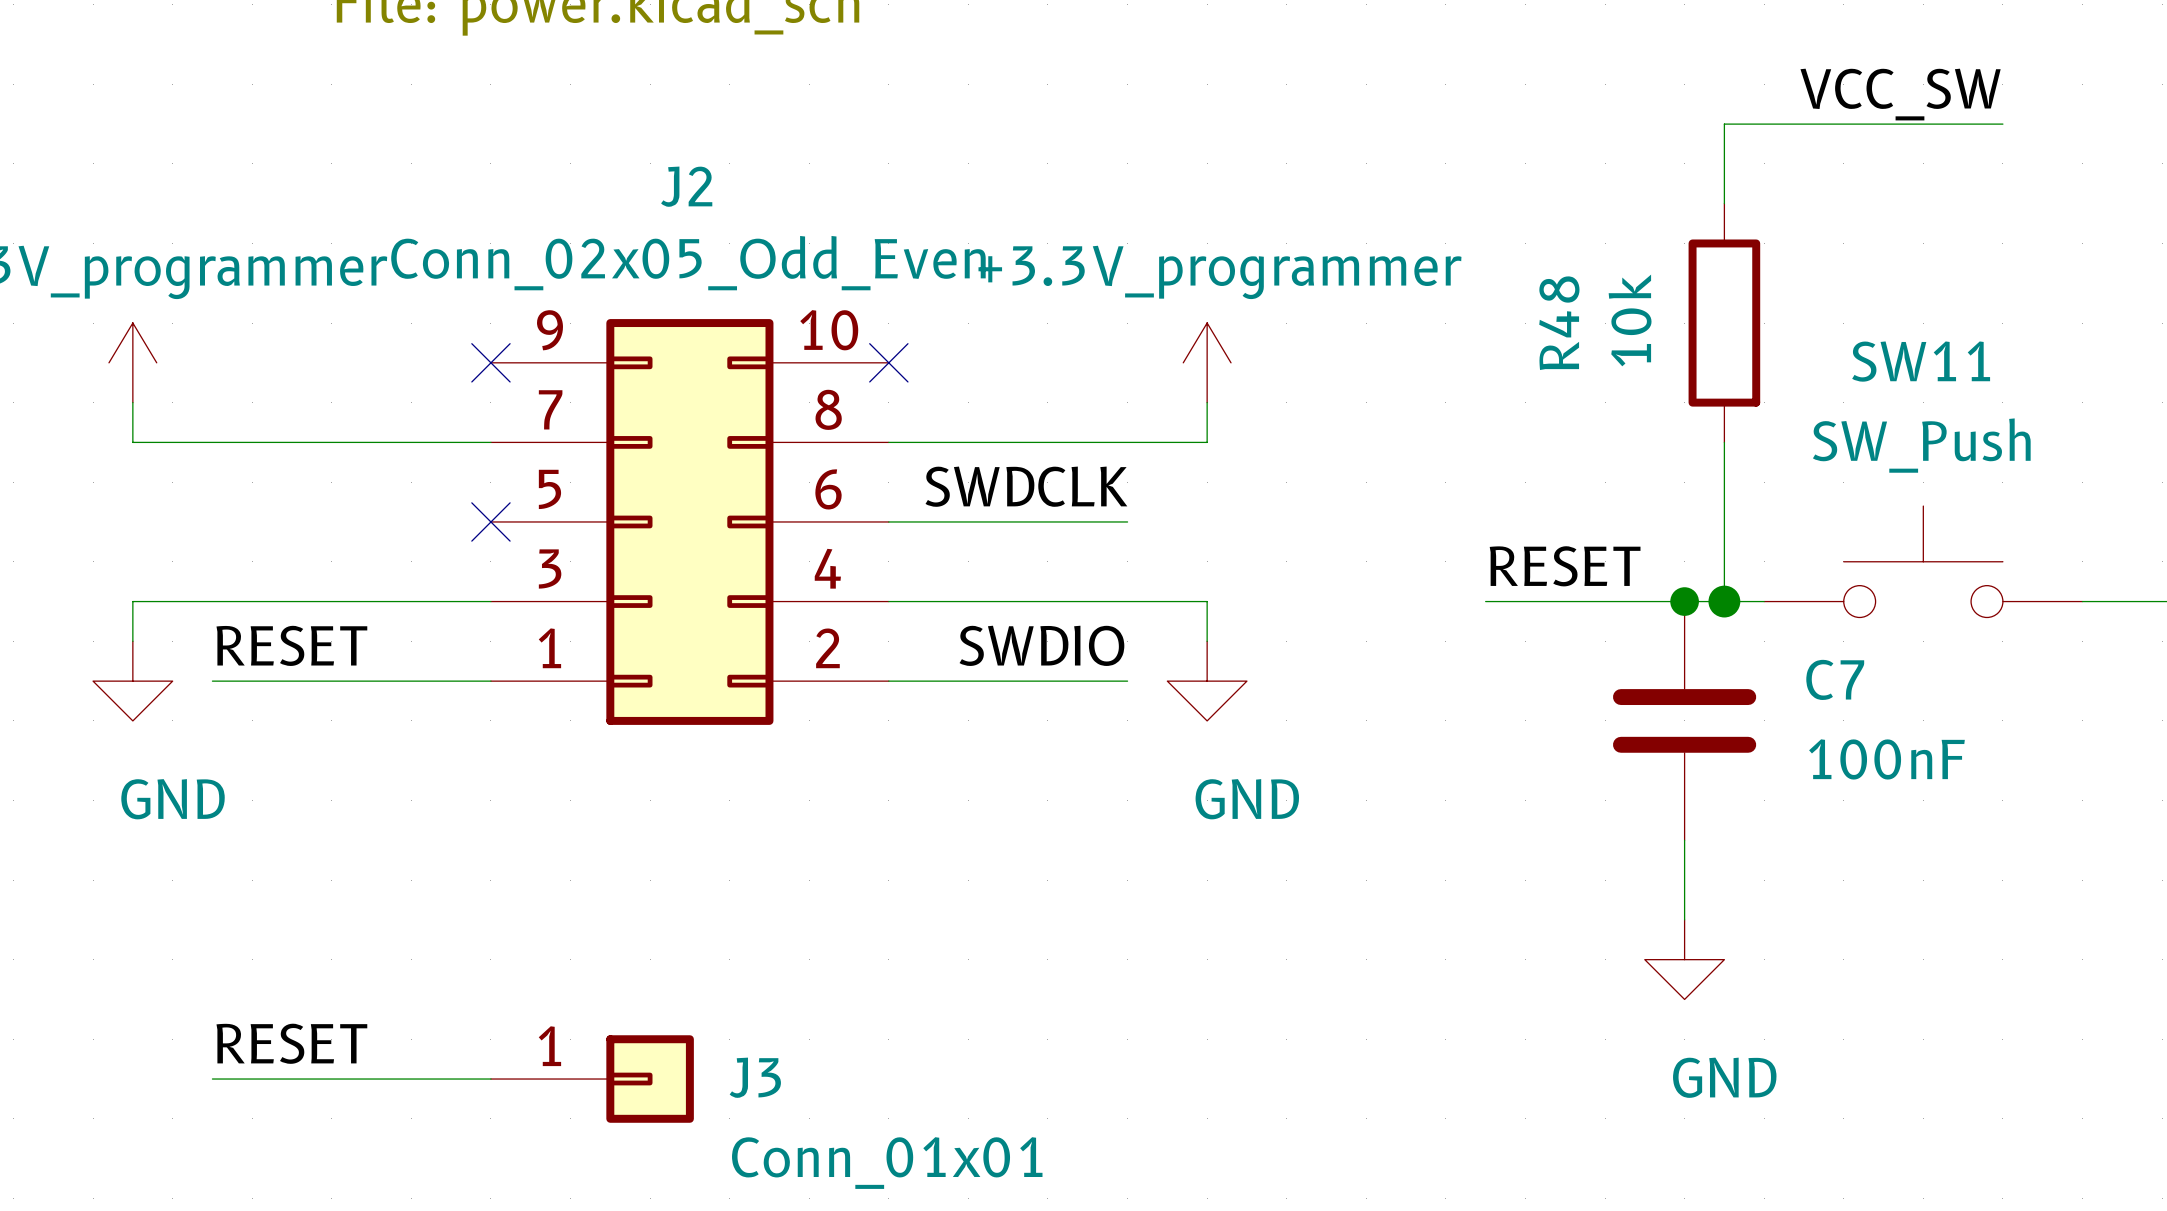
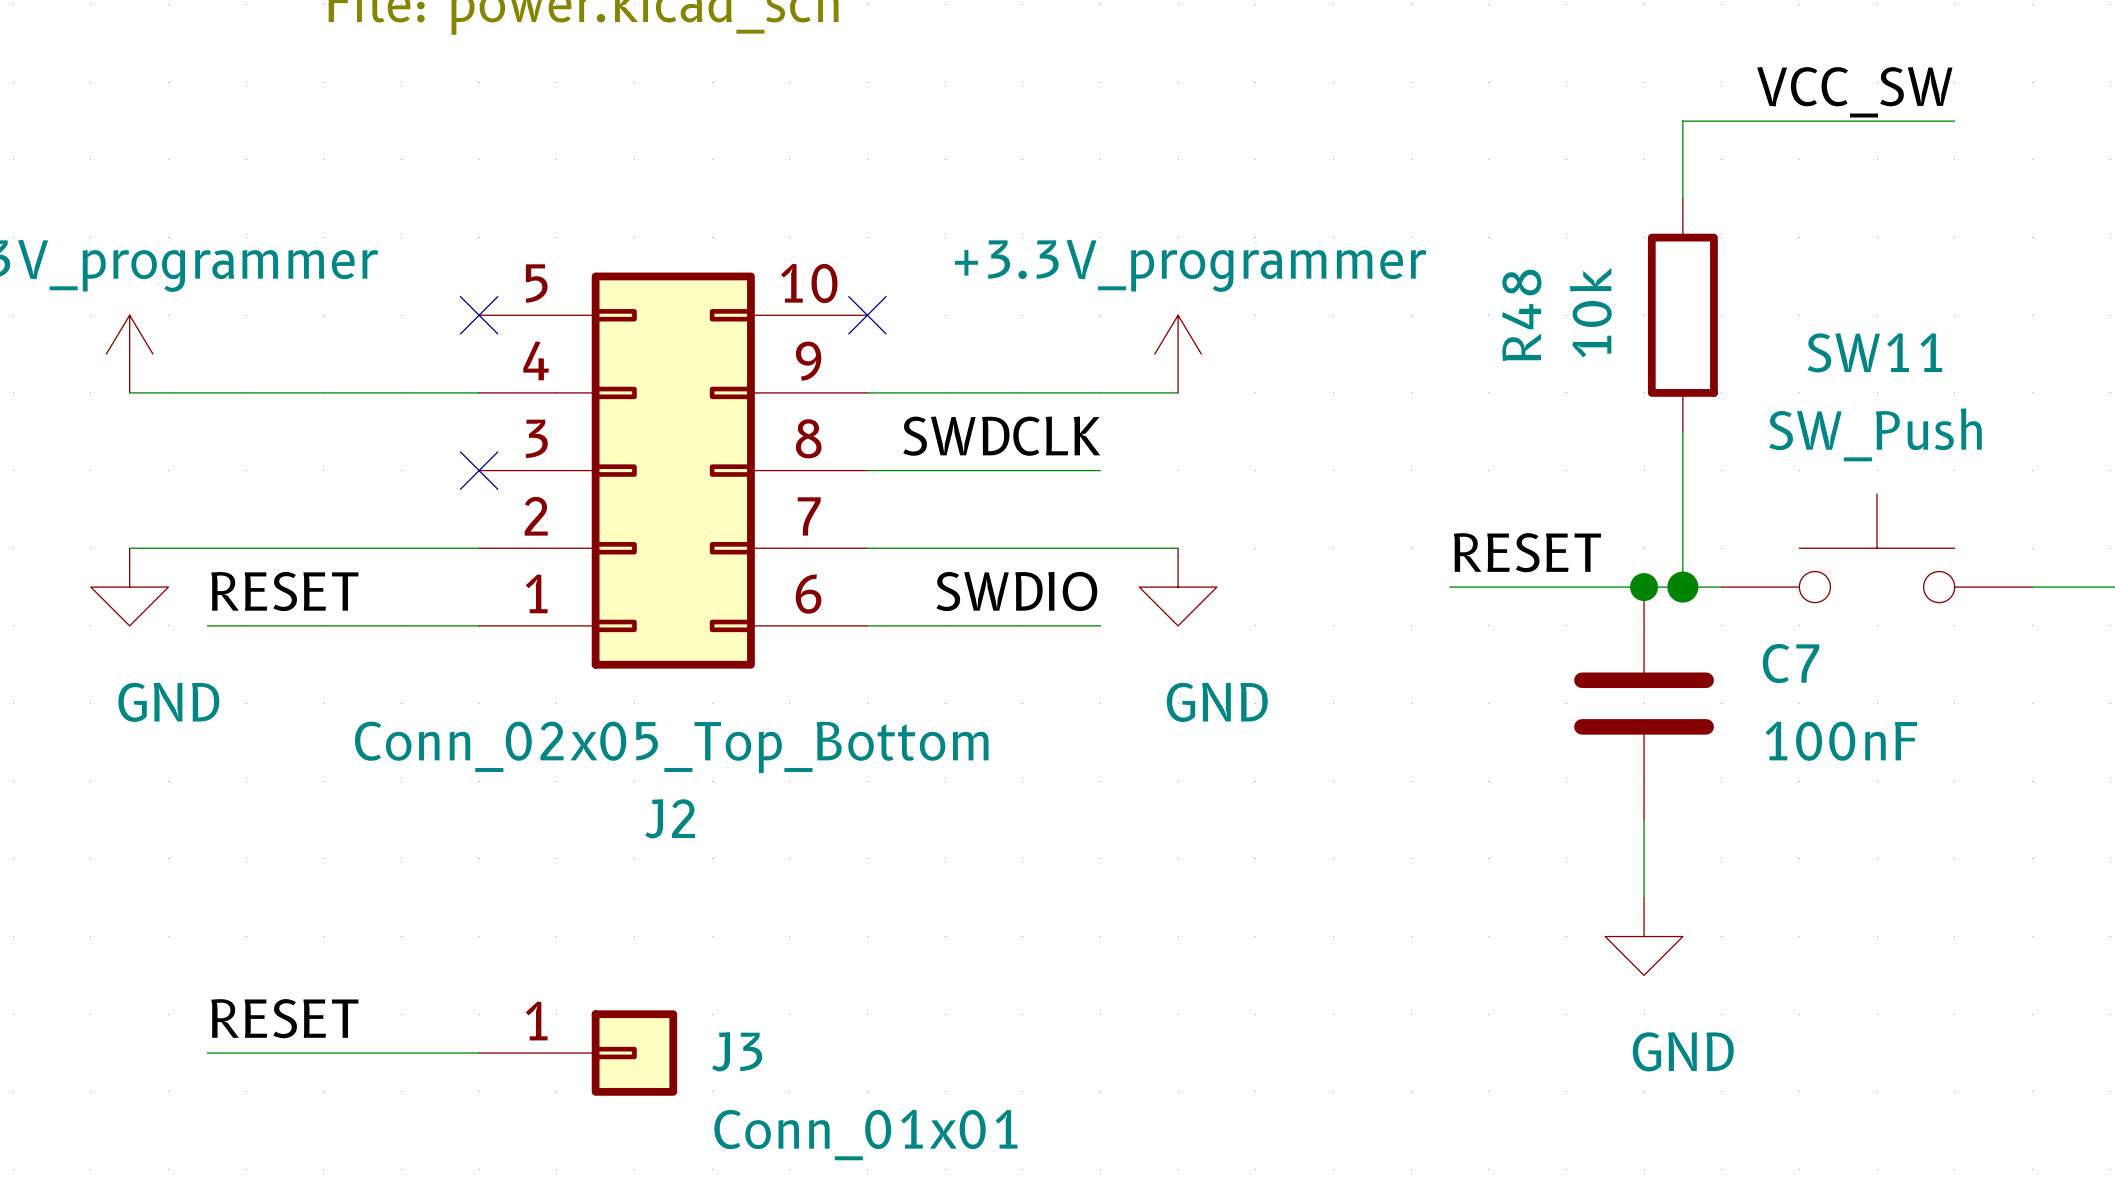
J2 name position: J2 (686, 186) -> J2 (670, 818)
J2 value: Conn_02x05_Odd_Even (688, 263) -> Conn_02x05_Top_Bottom (671, 747)
J2 pin number: 9 (549, 330) -> 5 (536, 283)
no-connect mark position: (490, 362) -> (479, 315)
no-connect mark position: (888, 362) -> (867, 315)
wire: (132, 402) (132, 442) (490, 442) -> (129, 392) (479, 392)
wire: (1207, 402) (1207, 442) (888, 442) -> (1178, 392) (867, 392)
J2 pin number: 7 (550, 409) -> 4 (536, 360)
J2 pin number: 8 (828, 409) -> 9 (808, 361)
label position: SWDCLK (1026, 486) -> SWDCLK (1001, 436)
J2 pin number: 5 (549, 489) -> 3 (536, 438)
J2 pin number: 6 (828, 489) -> 8 (808, 438)
no-connect mark position: (490, 521) -> (479, 470)
J2 position: (689, 521) -> (673, 470)
wire: (888, 521) (1127, 521) -> (867, 470) (1100, 470)
wire: none -> (129, 548) (479, 548)
wire: none -> (867, 548) (1178, 548)
J2 pin number: 4 (827, 568) -> 7 (809, 516)
J2 pin number: 3 (550, 569) -> 2 (536, 516)
wire: (490, 601) (132, 601) (132, 641) -> none
wire: (888, 601) (1207, 601) (1207, 641) -> none
label position: RESET (291, 645) -> RESET (284, 591)
label position: SWDIO (1041, 645) -> SWDIO (1016, 591)
J2 pin number: 2 (827, 648) -> 6 (808, 594)
power symbol position: GND (132, 681) -> GND (129, 587)
wire: (212, 681) (490, 681) -> (207, 625) (479, 625)
wire: (888, 681) (1127, 681) -> (867, 625) (1100, 625)
power symbol position: GND (1207, 681) -> GND (1178, 587)

